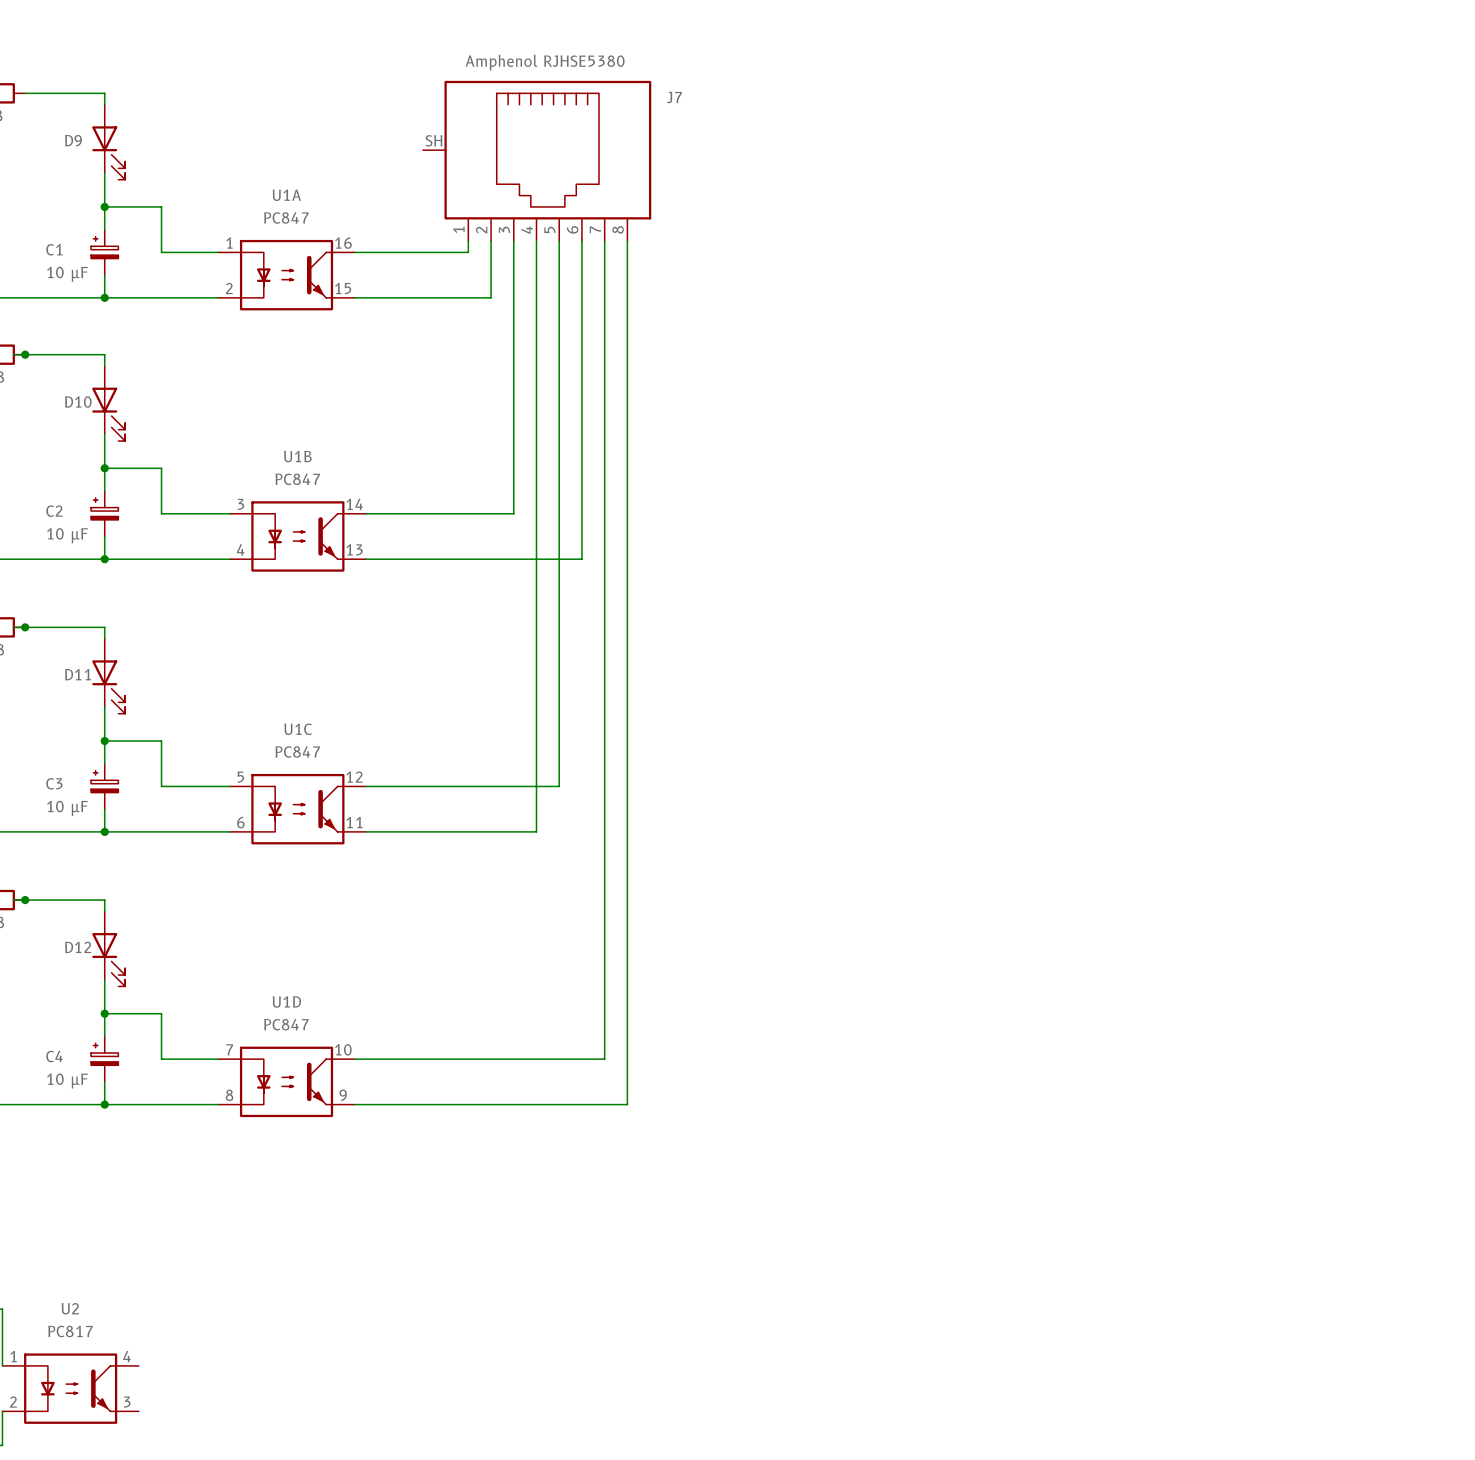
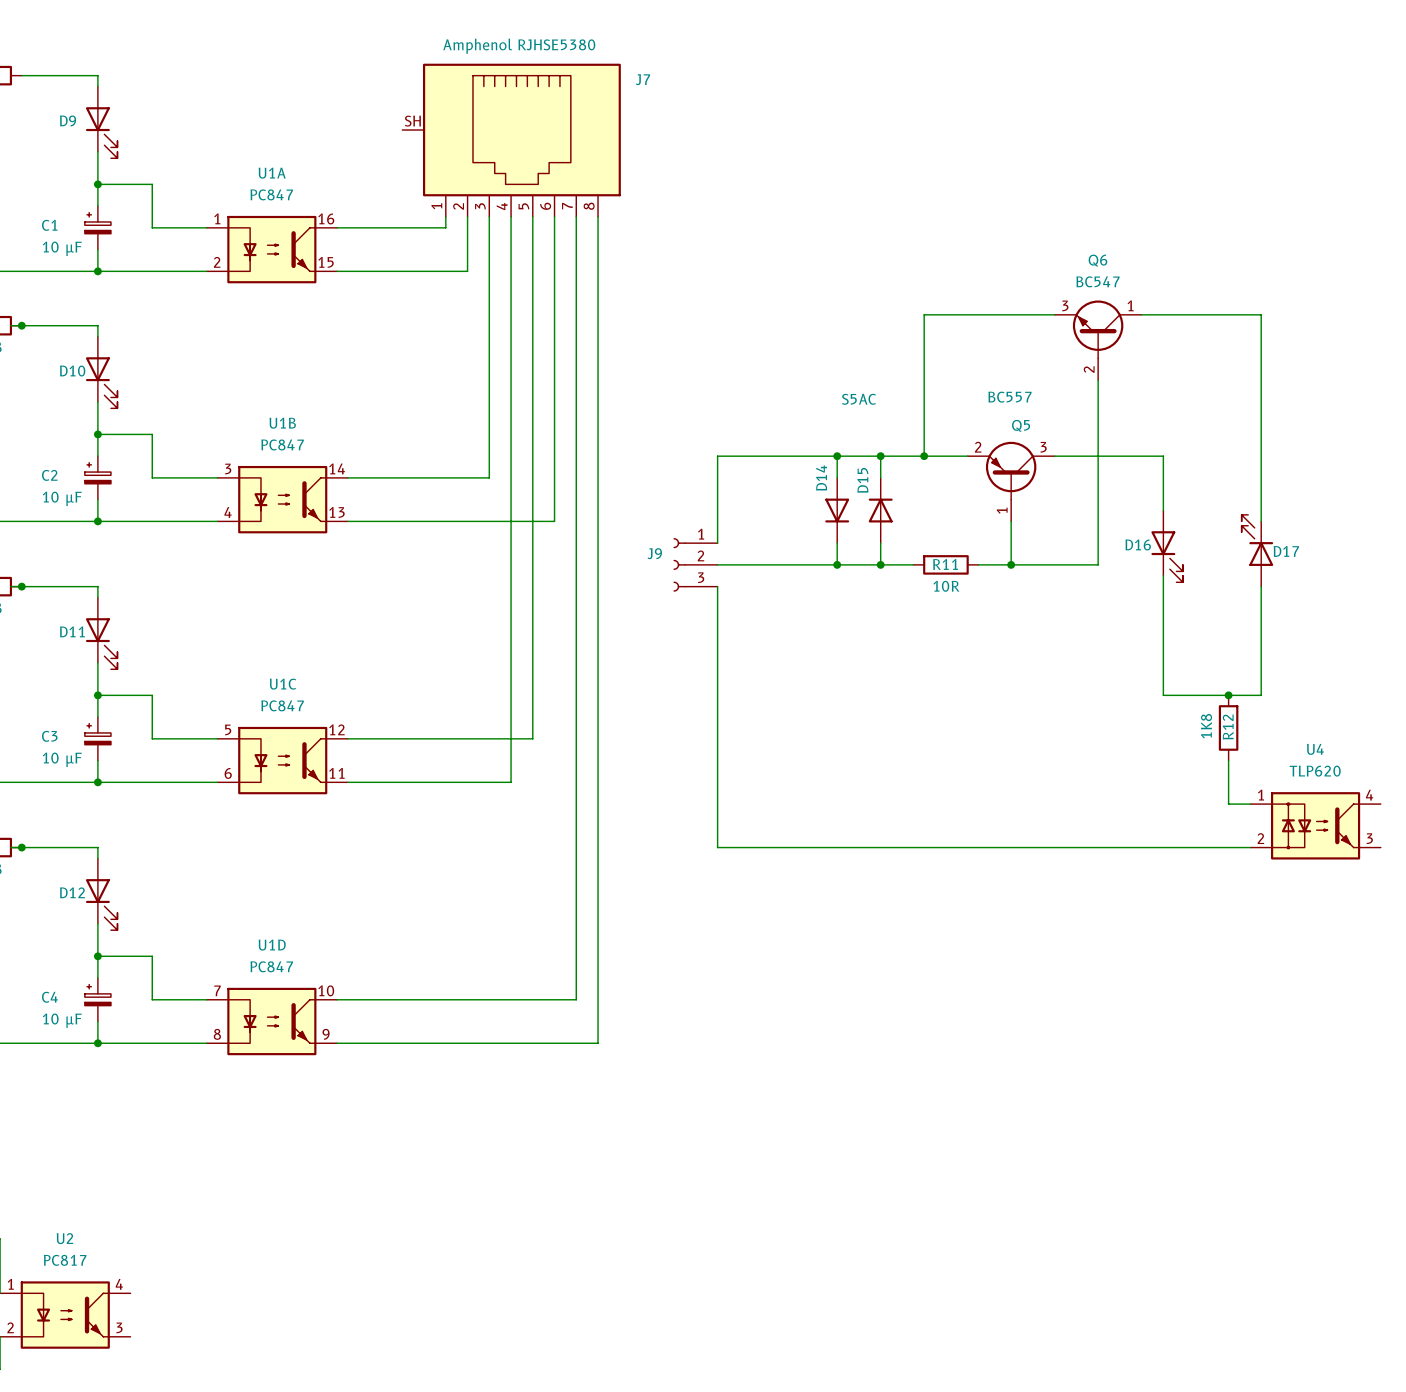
wire: none -> (1054, 314) (924, 314) (924, 456)
wire: none -> (1141, 314) (1261, 314) (1261, 521)
Q6: none -> BC547 (1098, 340)
wire: none -> (1098, 380) (1098, 564) (978, 564)
wire: none -> (837, 456) (837, 477)
junction: none -> (837, 456)
wire: none -> (880, 456) (880, 477)
junction: none -> (880, 456)
junction: none -> (924, 456)
wire: none -> (967, 456) (717, 456) (717, 543)
wire: none -> (1054, 456) (1163, 456) (1163, 510)
Q5: none -> BC557 (1011, 481)
D14: none -> S5AC (837, 510)
D15: none -> (880, 510)
wire: none -> (1011, 521) (1011, 564)
wire: none -> (837, 543) (837, 564)
wire: none -> (880, 543) (880, 564)
D16: none -> (1167, 546)
D17: none -> (1257, 550)
J9: none -> (695, 564)
wire: none -> (717, 564) (913, 564)
junction: none -> (837, 564)
junction: none -> (880, 564)
R11: none -> 10R (945, 564)
junction: none -> (1011, 564)
wire: none -> (1163, 575) (1163, 695) (1261, 695) (1261, 586)
wire: none -> (717, 586) (717, 847) (1250, 847)
junction: none -> (1228, 695)
R12: none -> 1K8 (1228, 727)
wire: none -> (1228, 760) (1228, 804) (1250, 804)
U4: none -> TLP620 (1315, 825)

